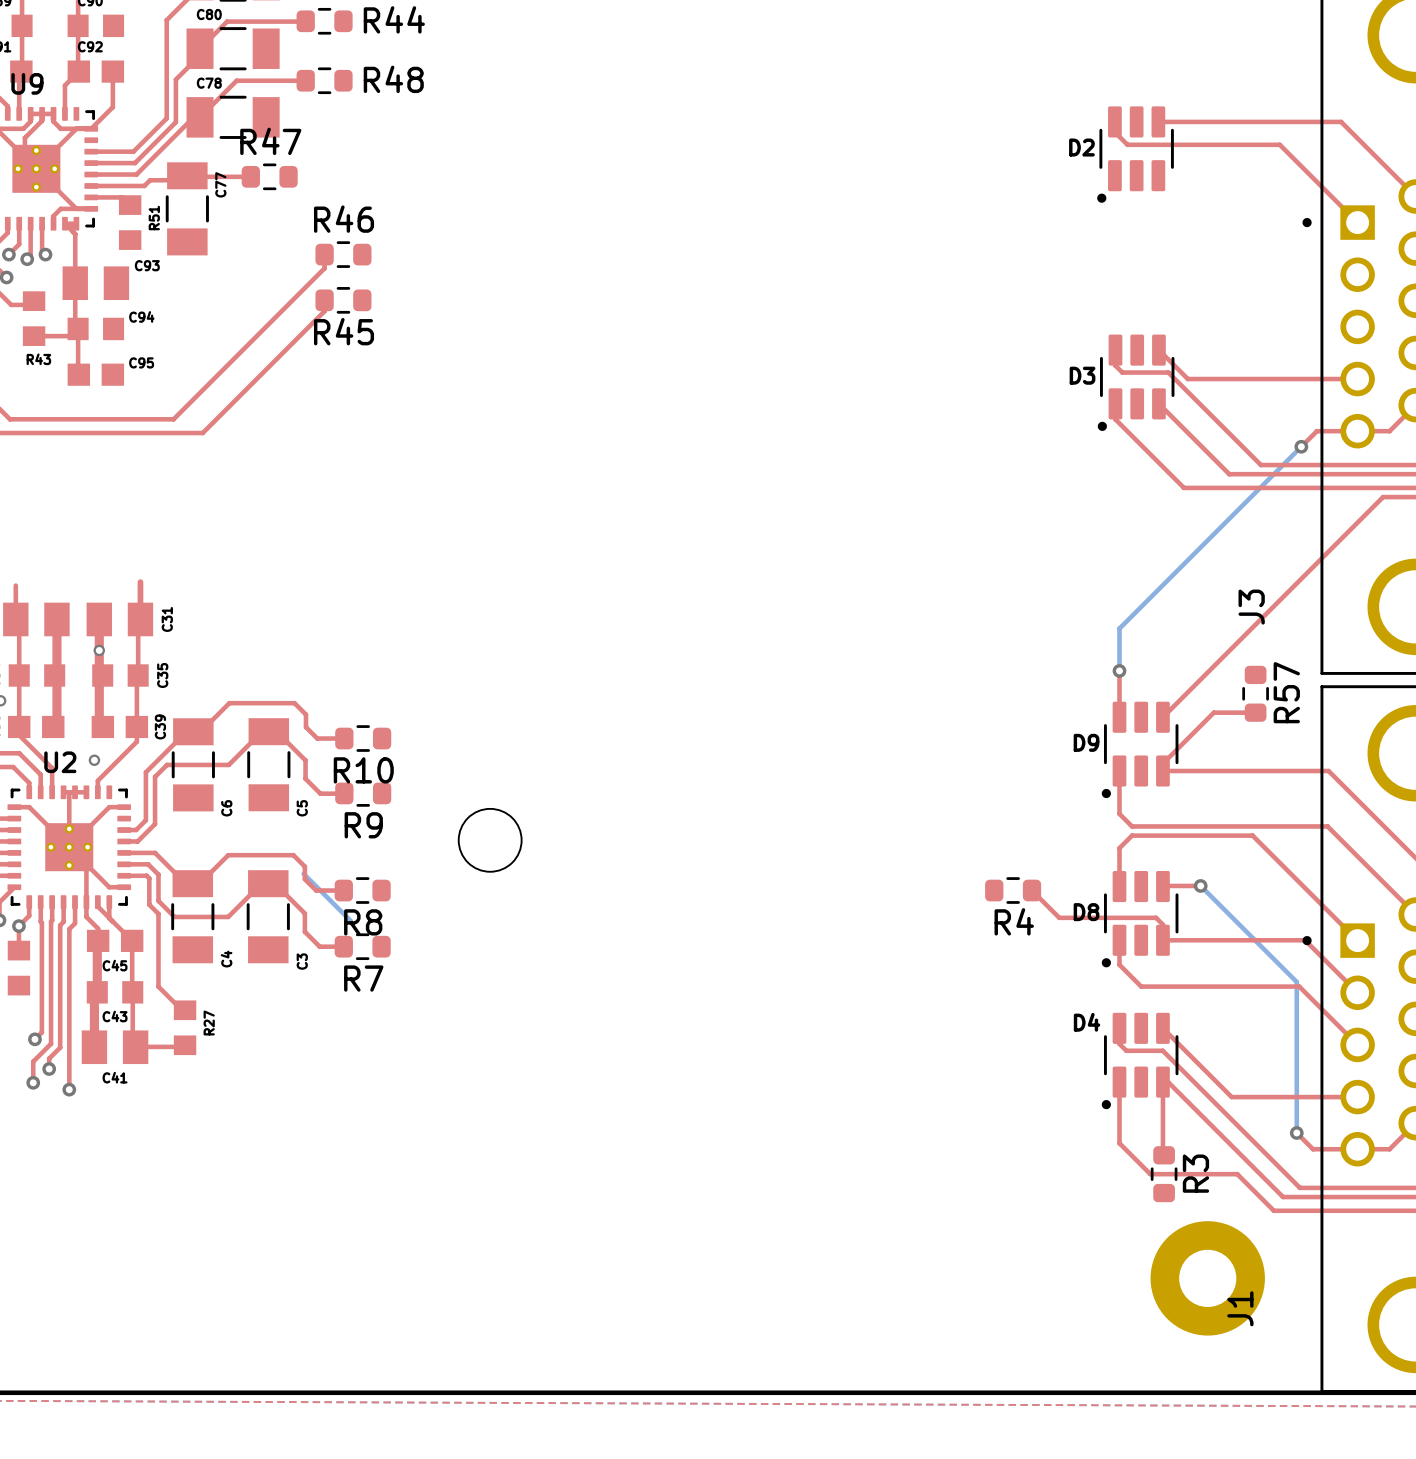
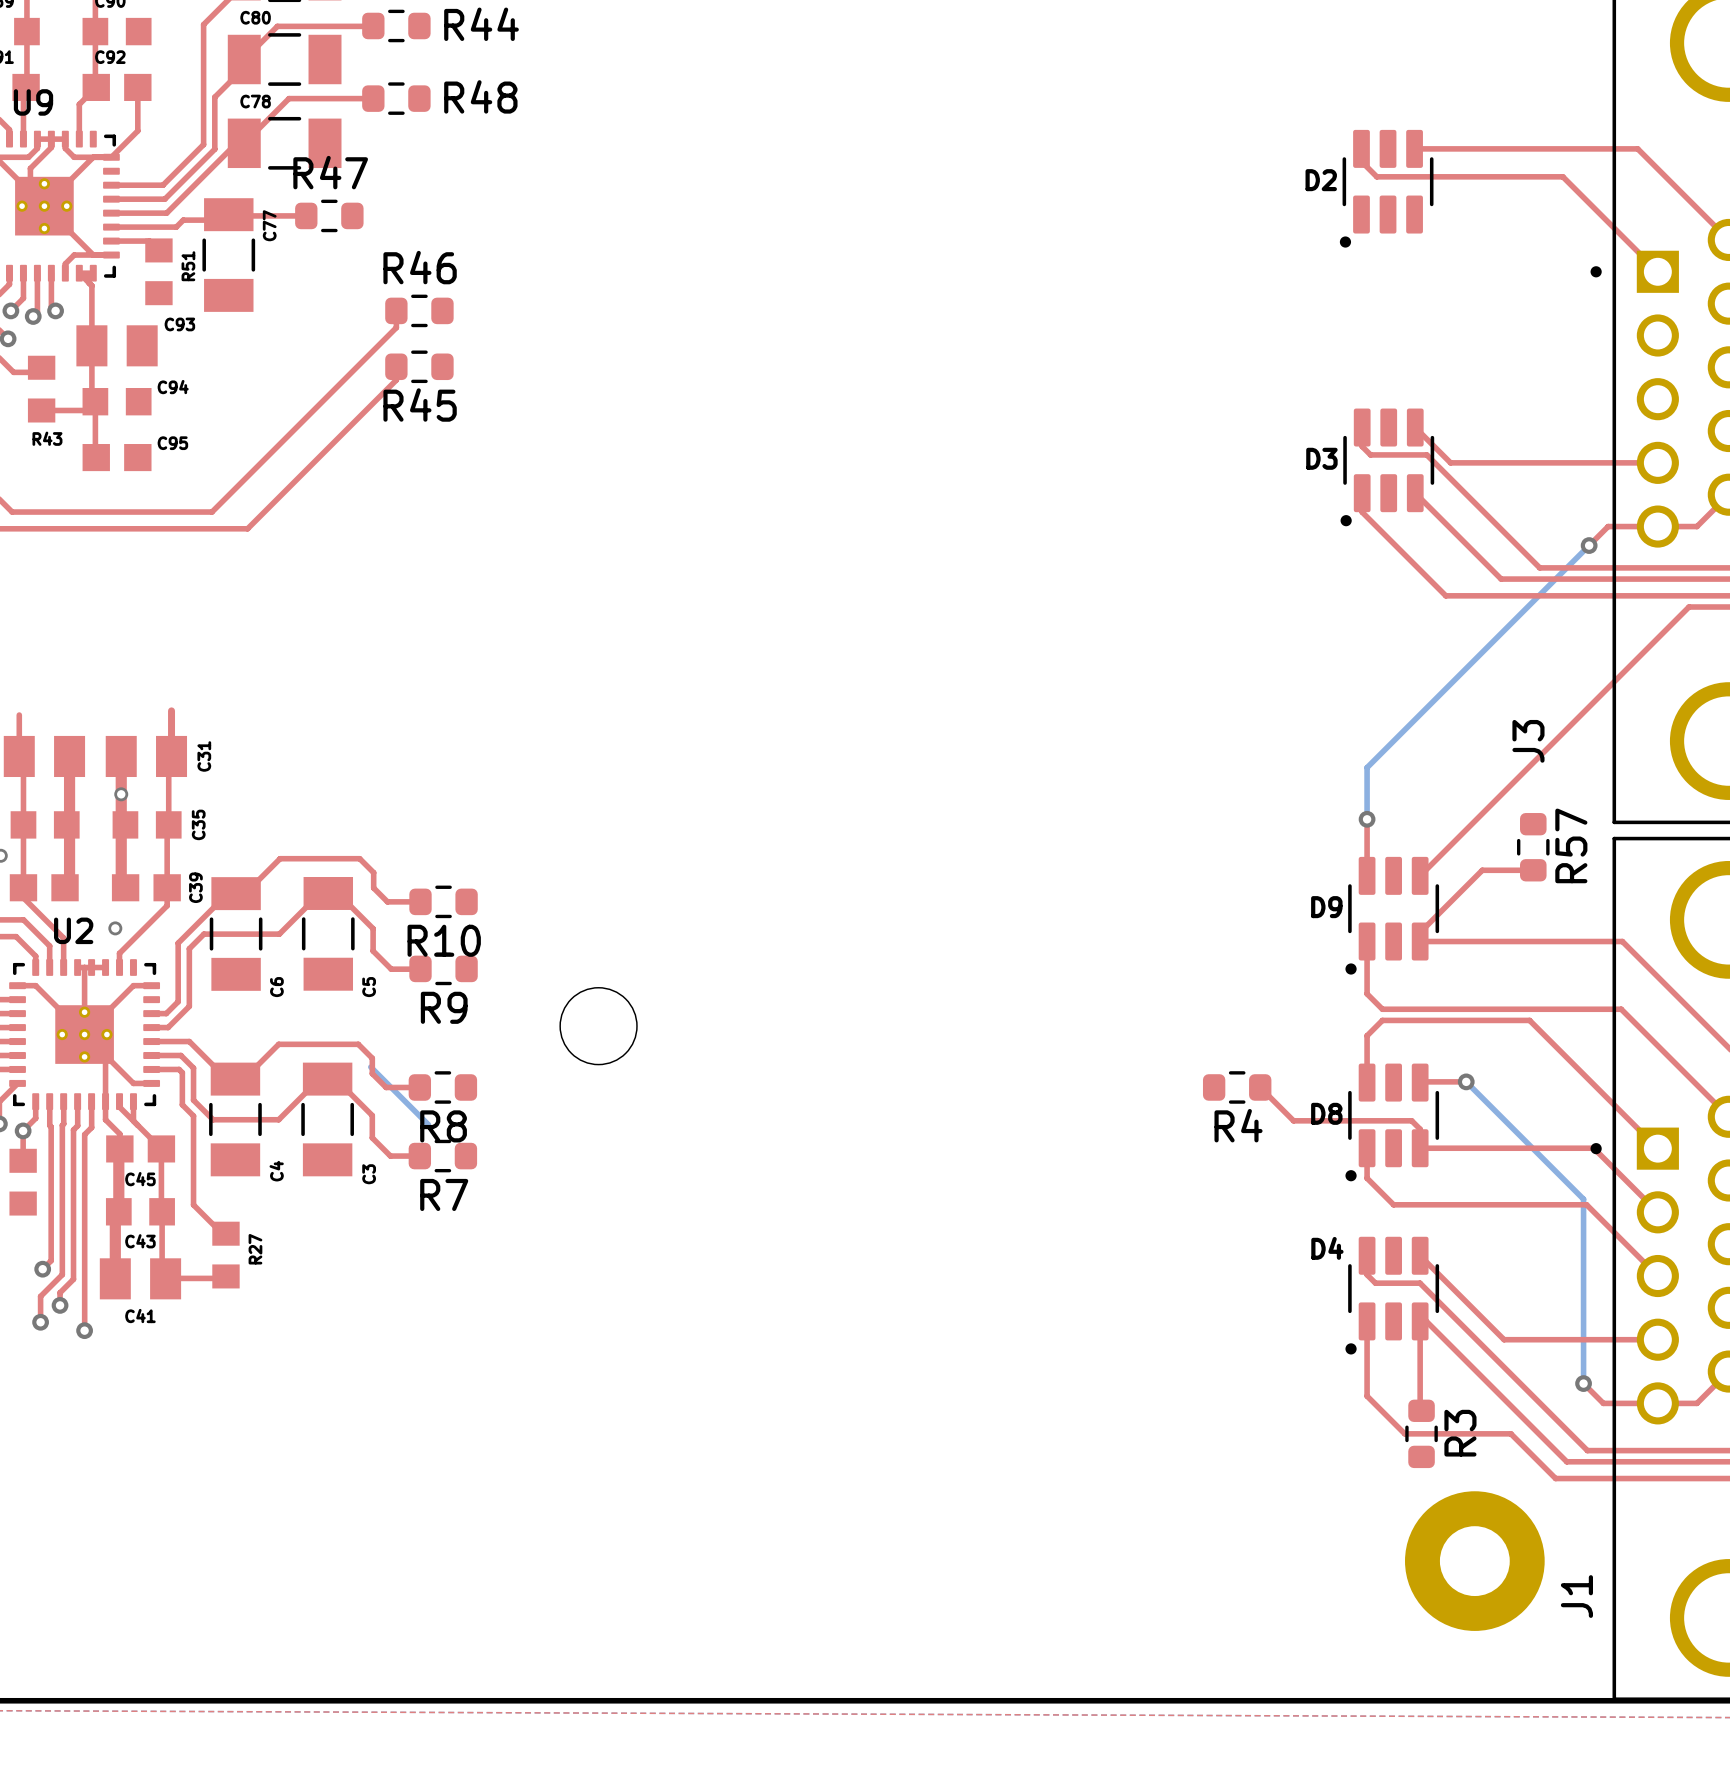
J1 name position: J1 (1240, 1308) -> J1 (1576, 1596)

